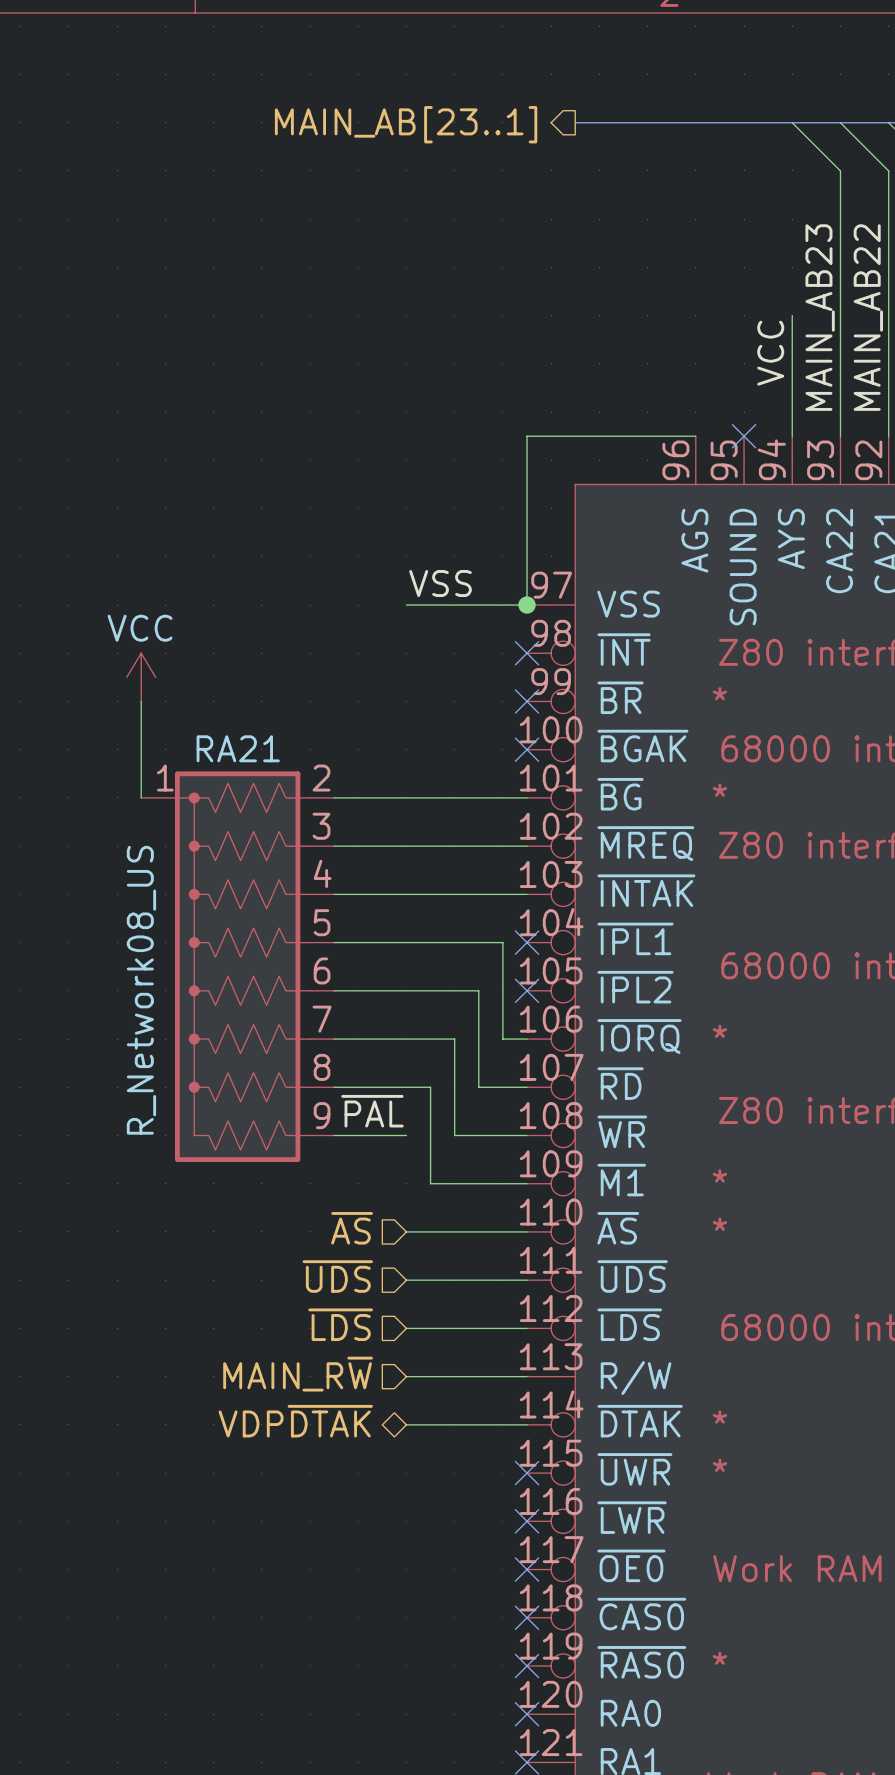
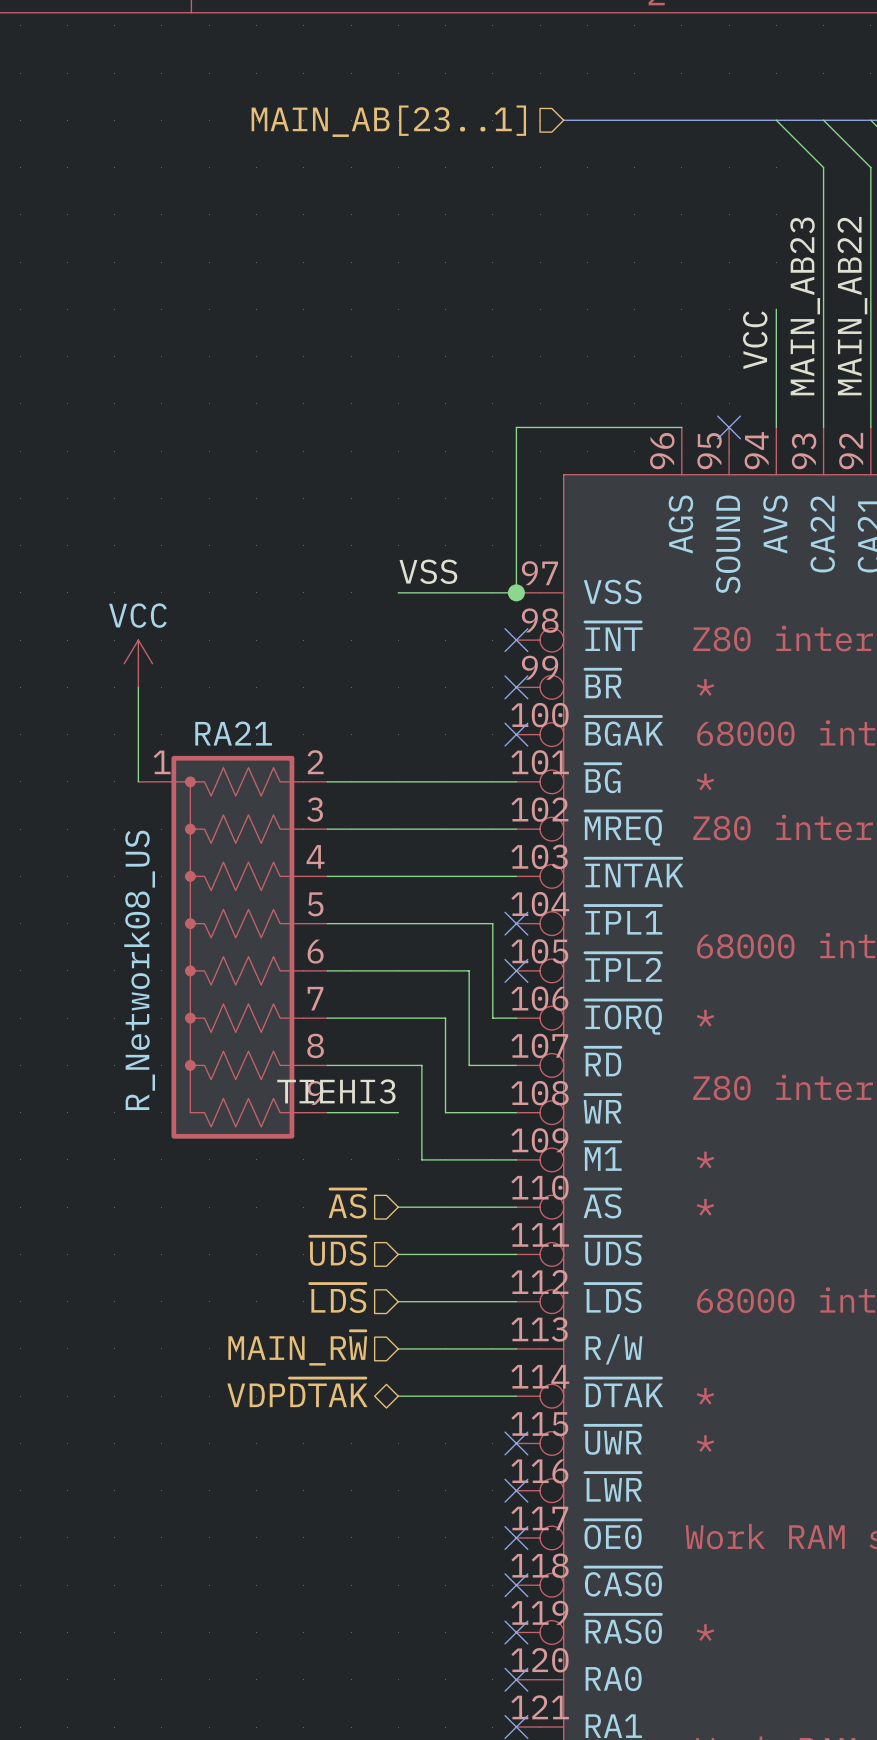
hierarchical label shape: output (406, 124) -> input (388, 121)
part pin name: AYS (791, 538) -> AVS (775, 524)
label: ~{PAL} (372, 1111) -> TIEHI3 (336, 1091)

